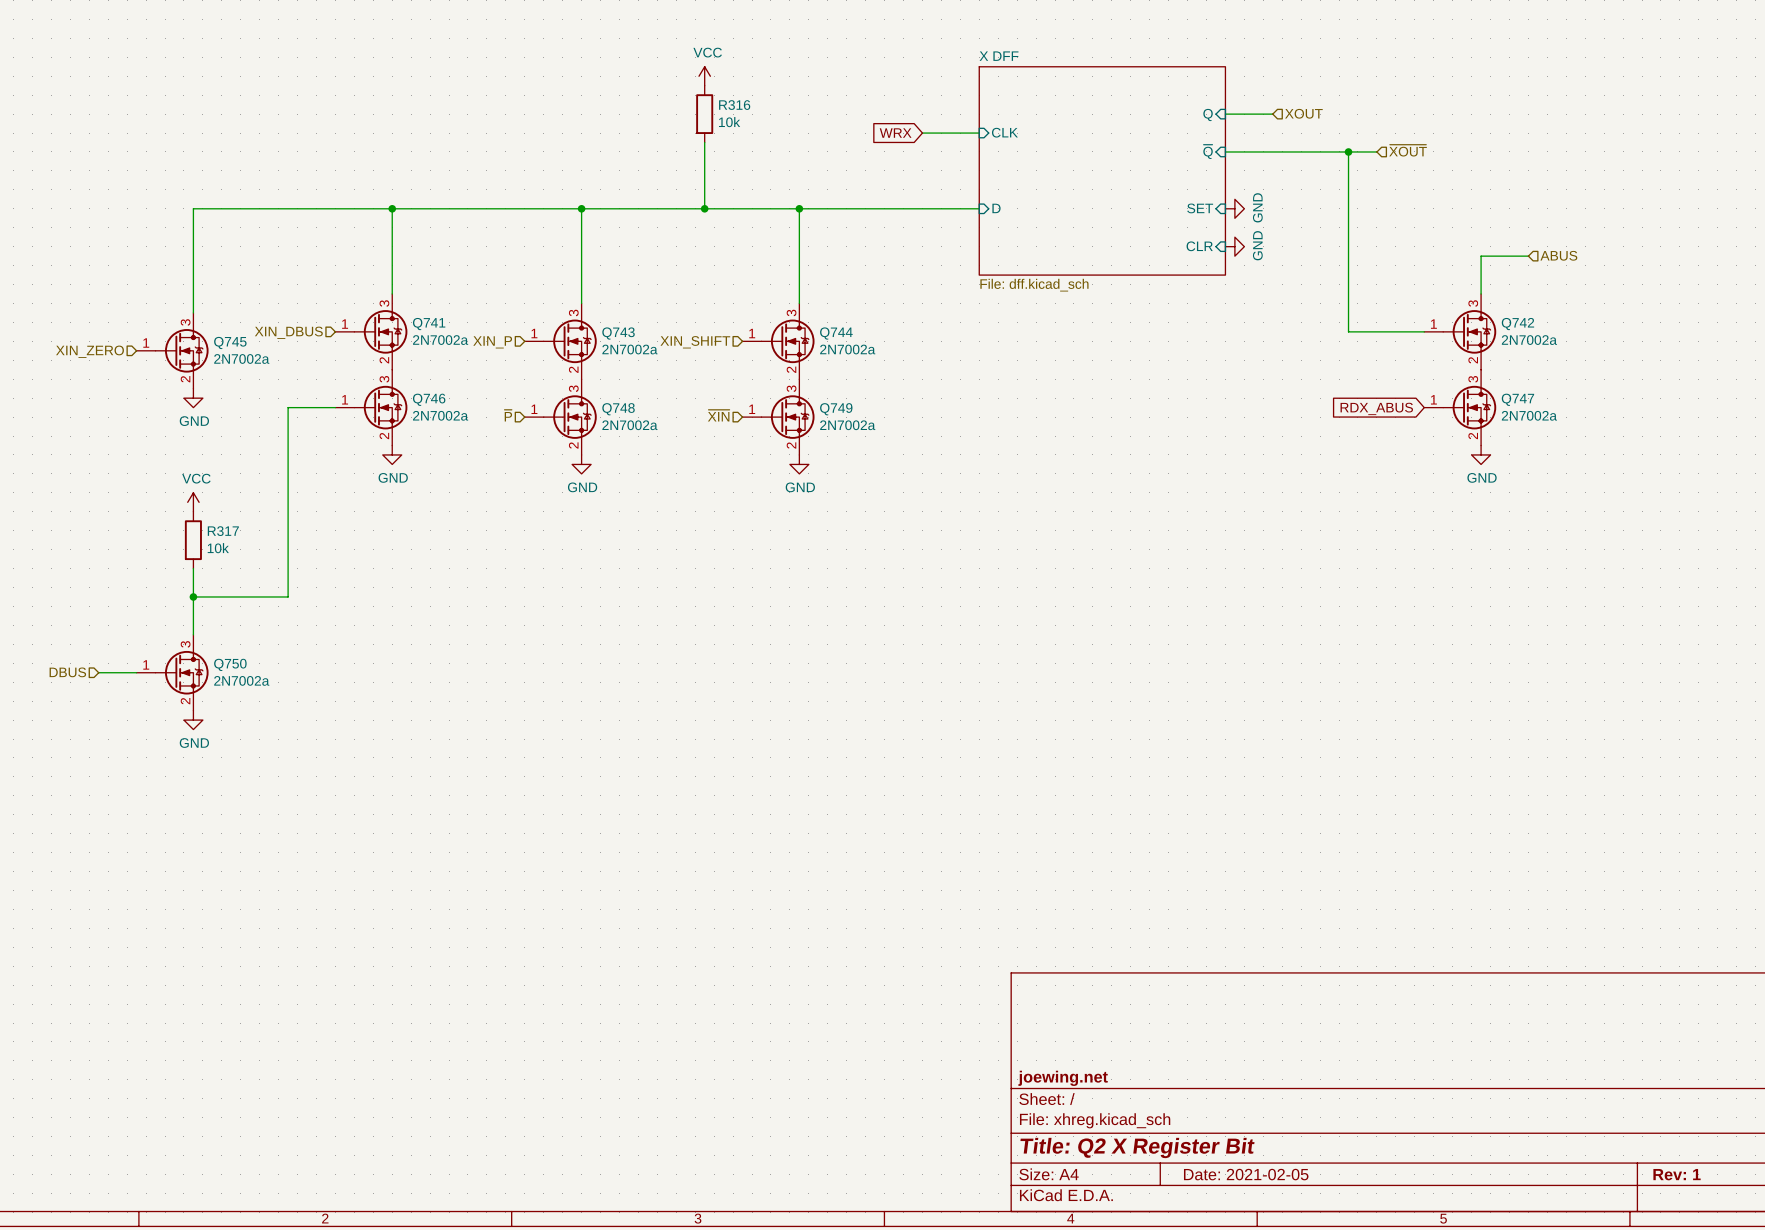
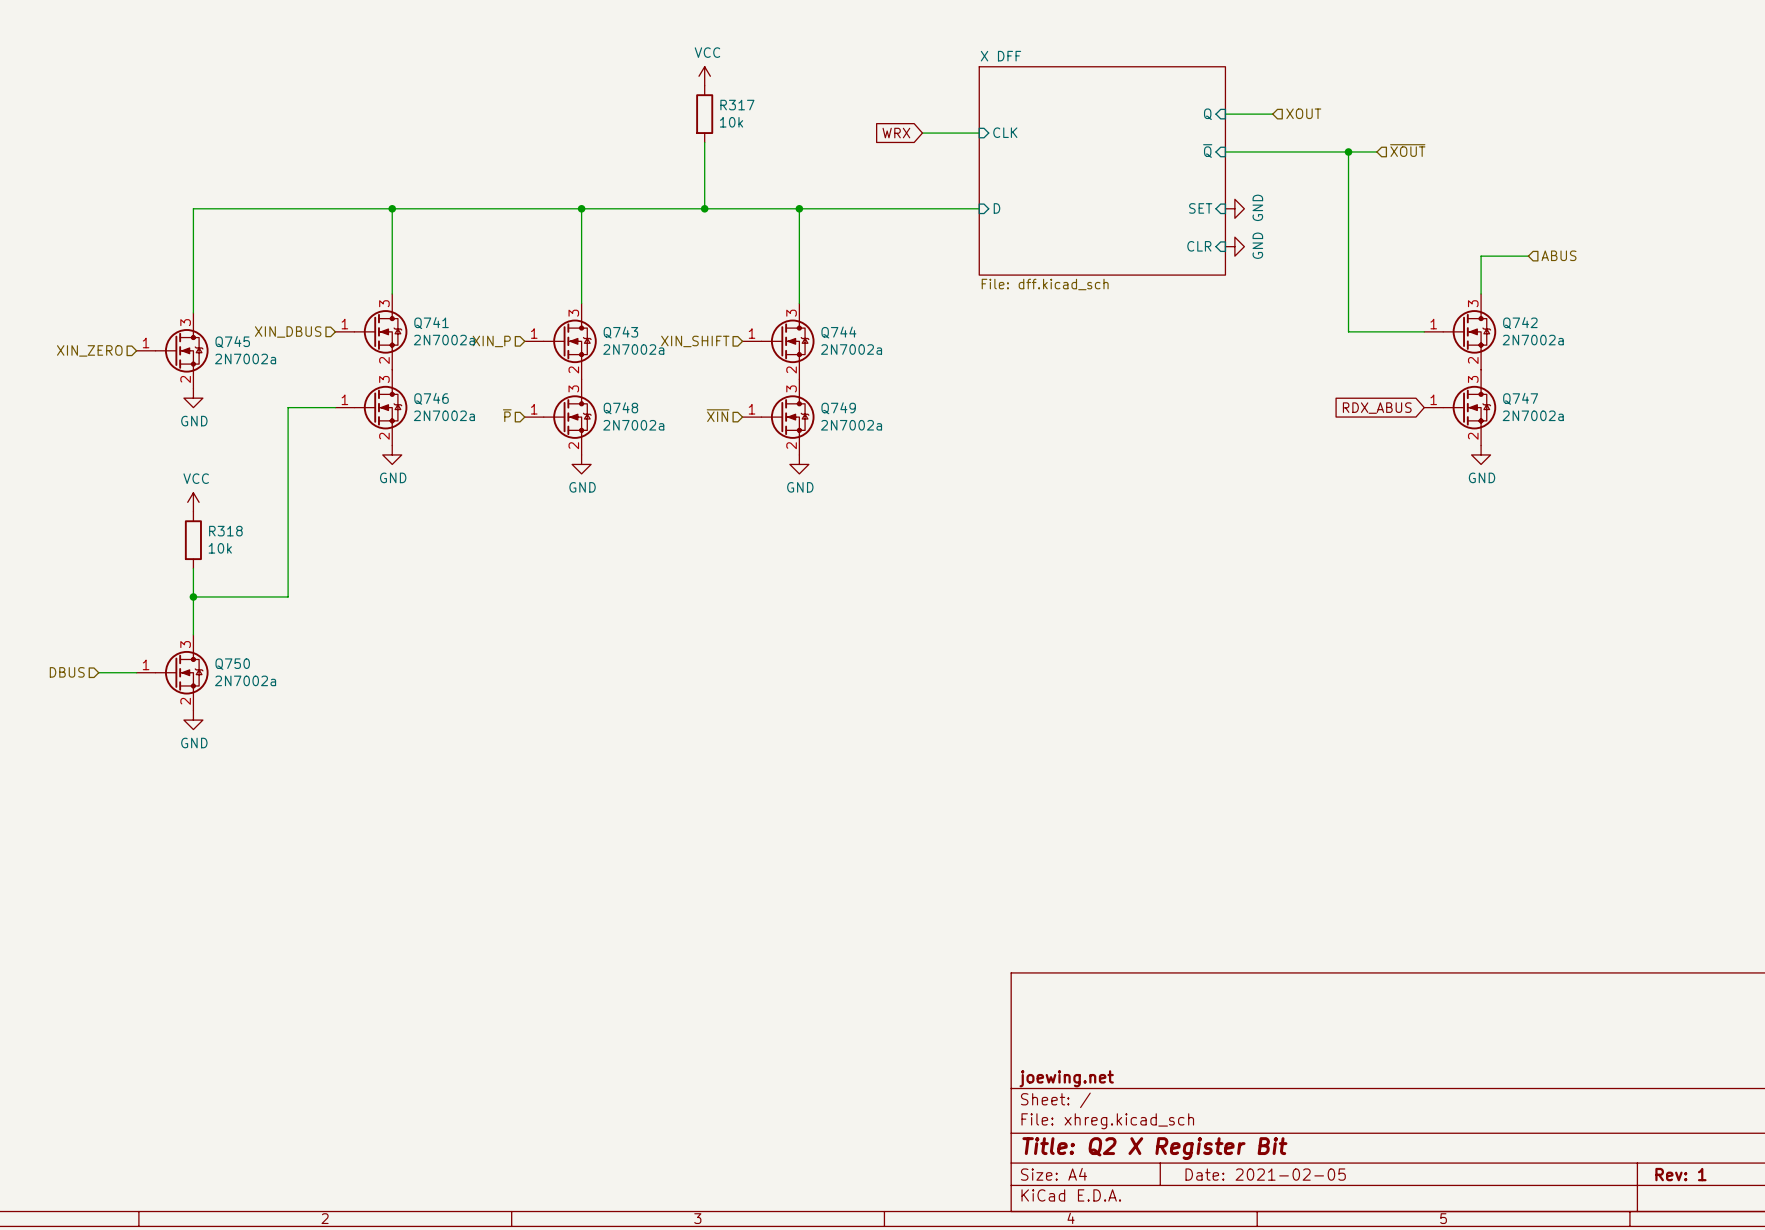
R316 name: R316 (734, 105) -> R317 (737, 105)
R317 name: R317 (223, 531) -> R318 (225, 531)

